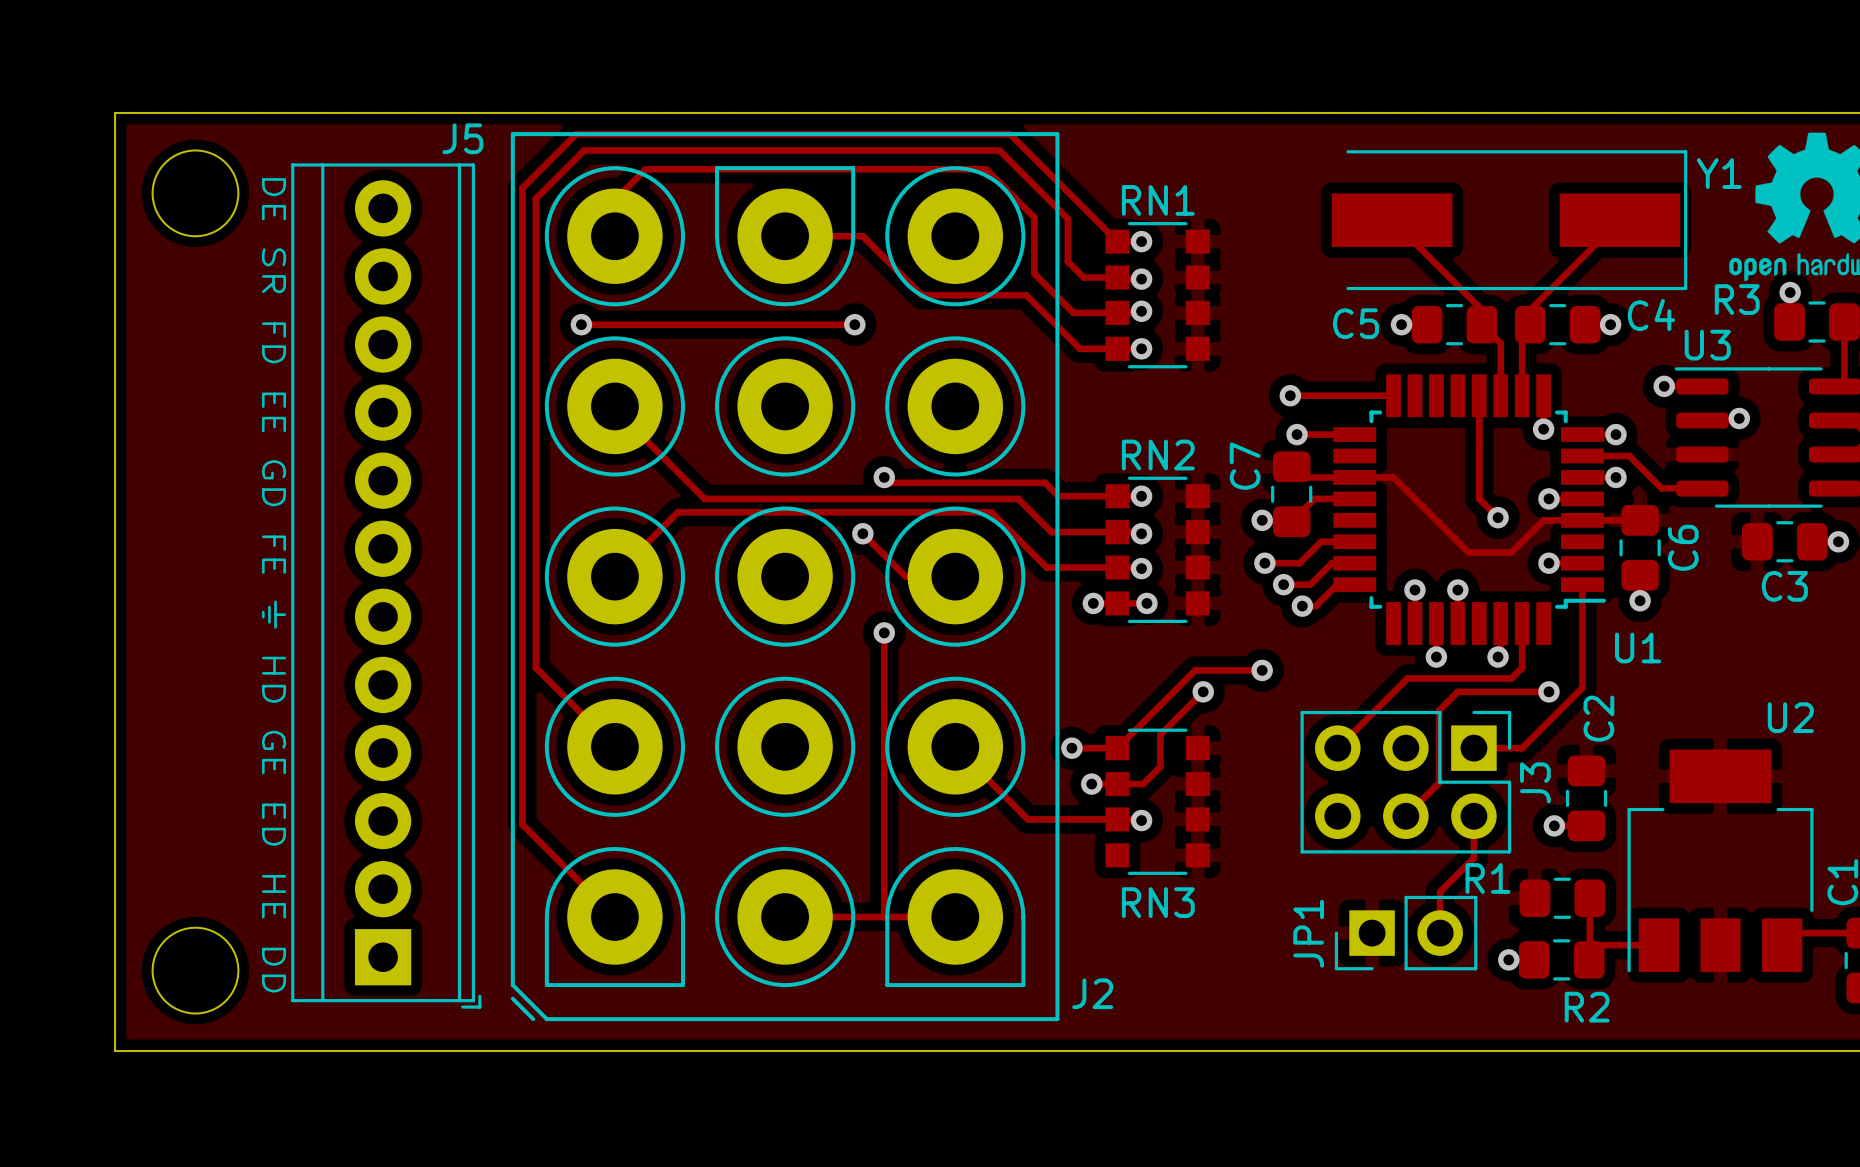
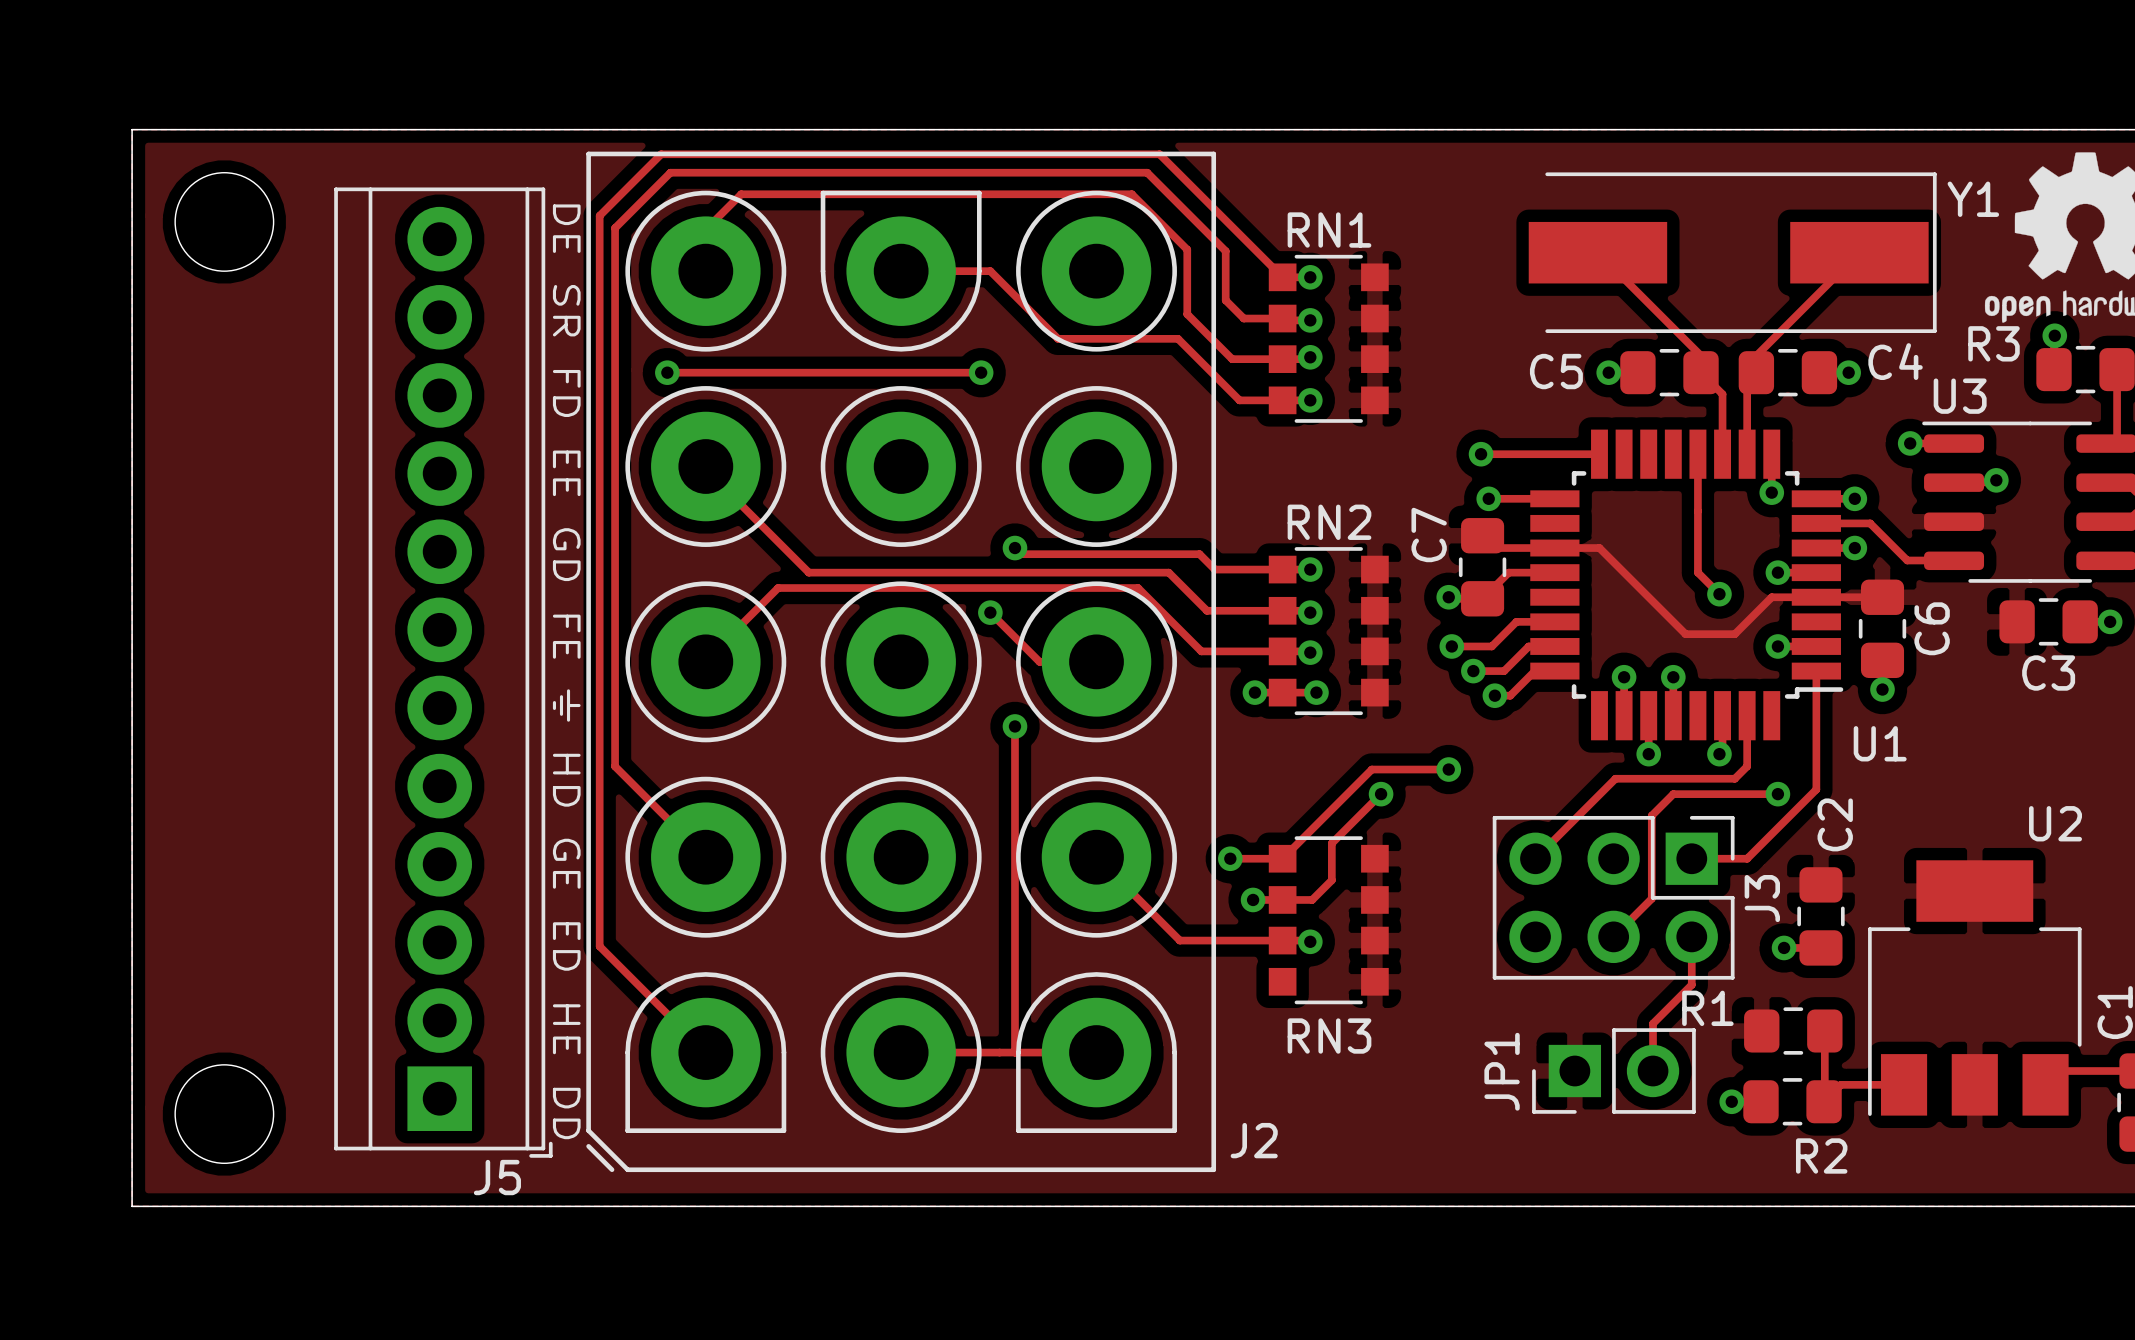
J5 name position: J5 (462, 138) -> J5 (497, 1177)
text position: DE SR FD EE GD FE ⏚ HD GE ED HE DD (274, 585) -> DE SR FD EE GD FE ⏚ HD GE ED HE DD (566, 671)

